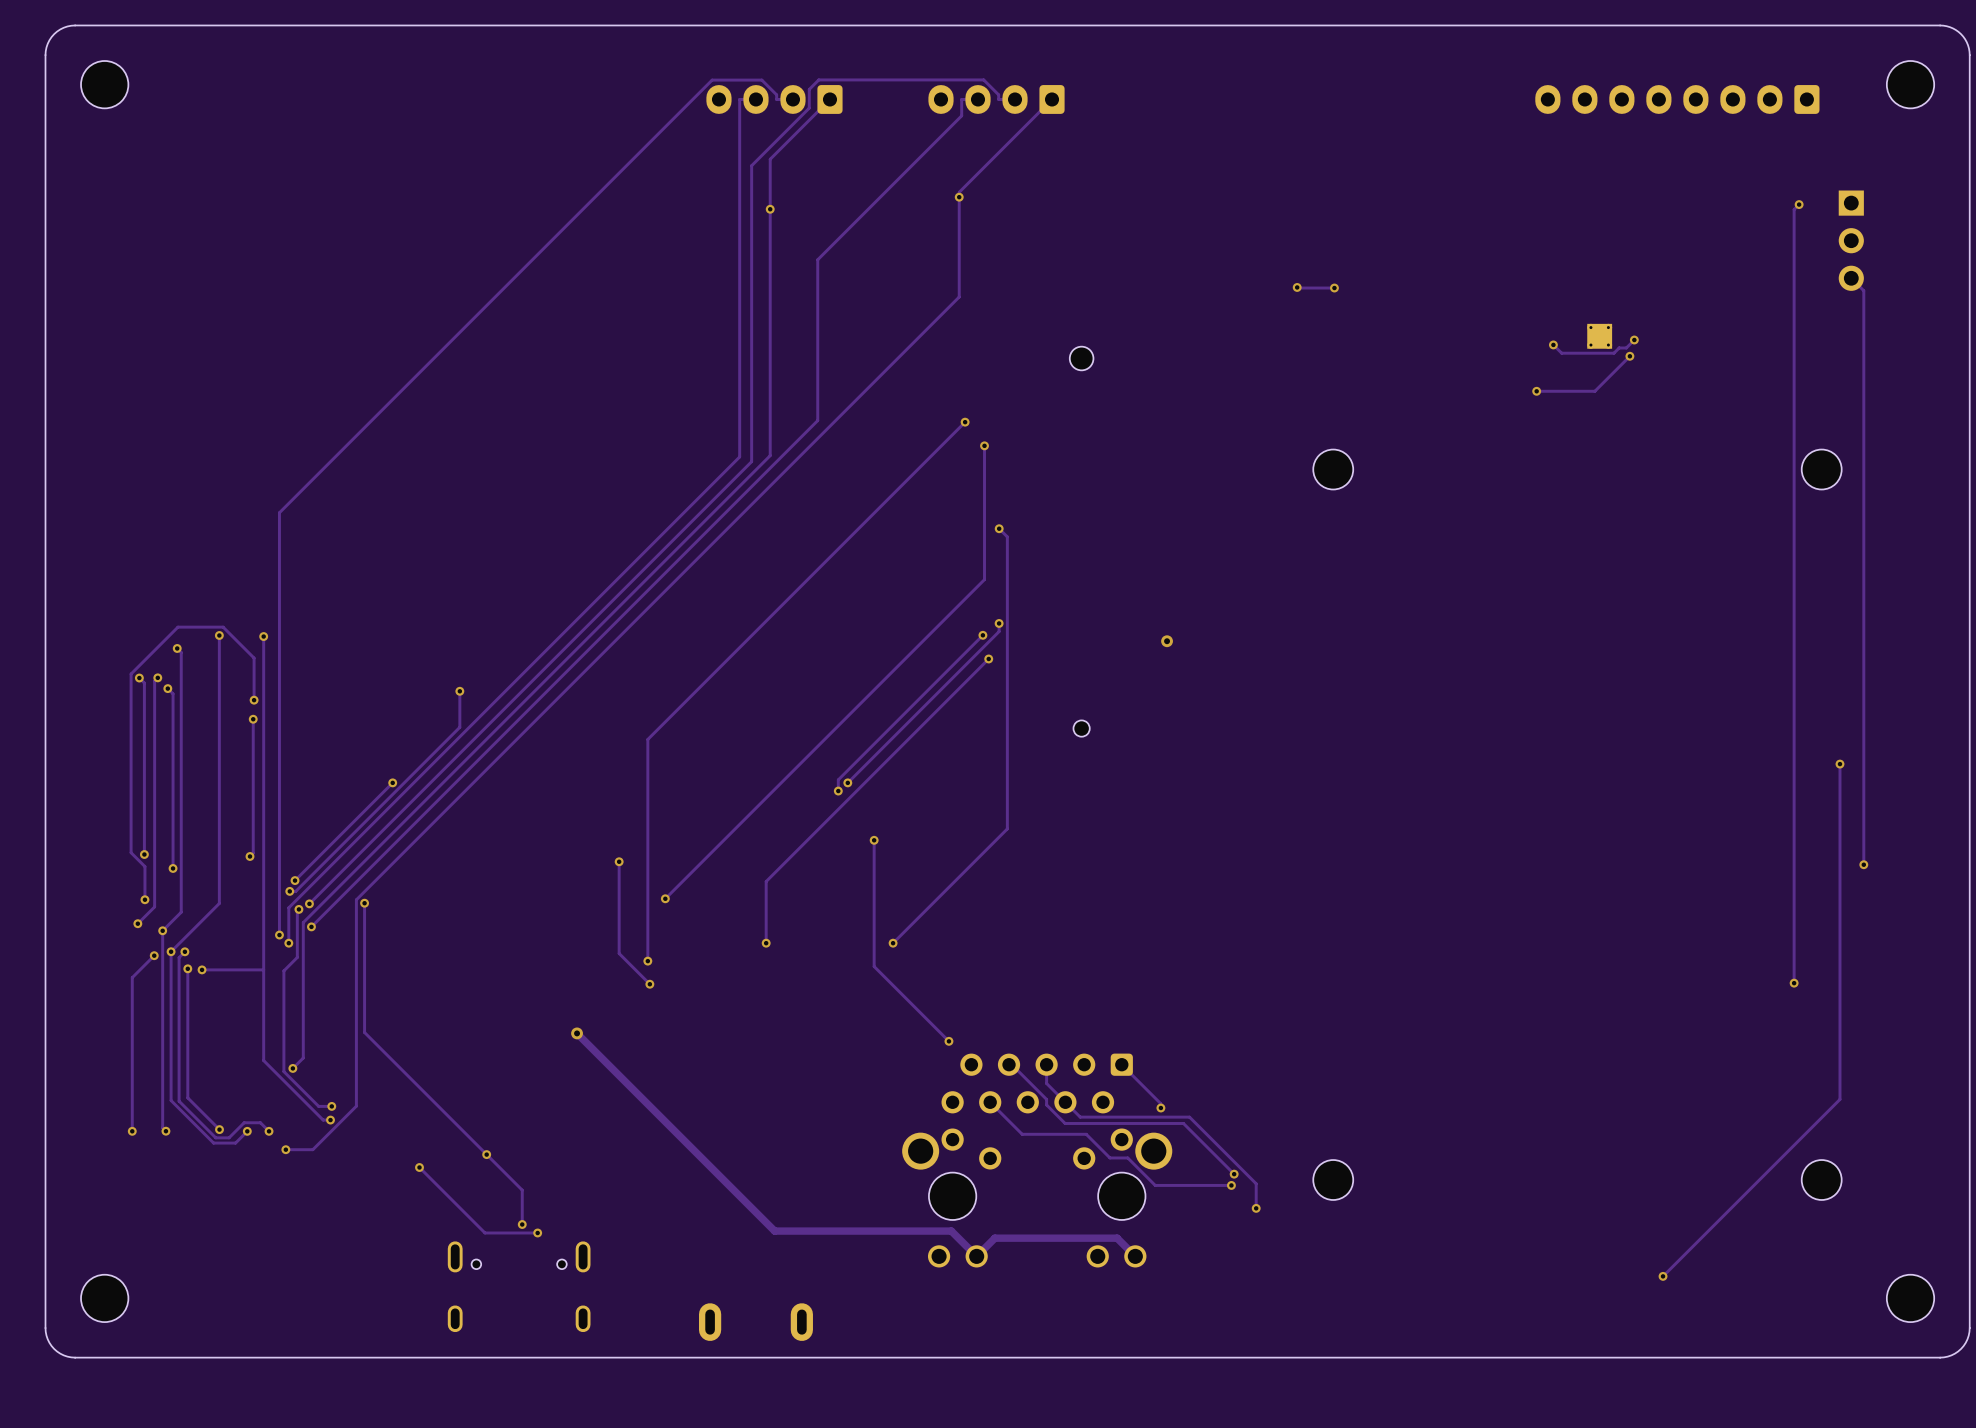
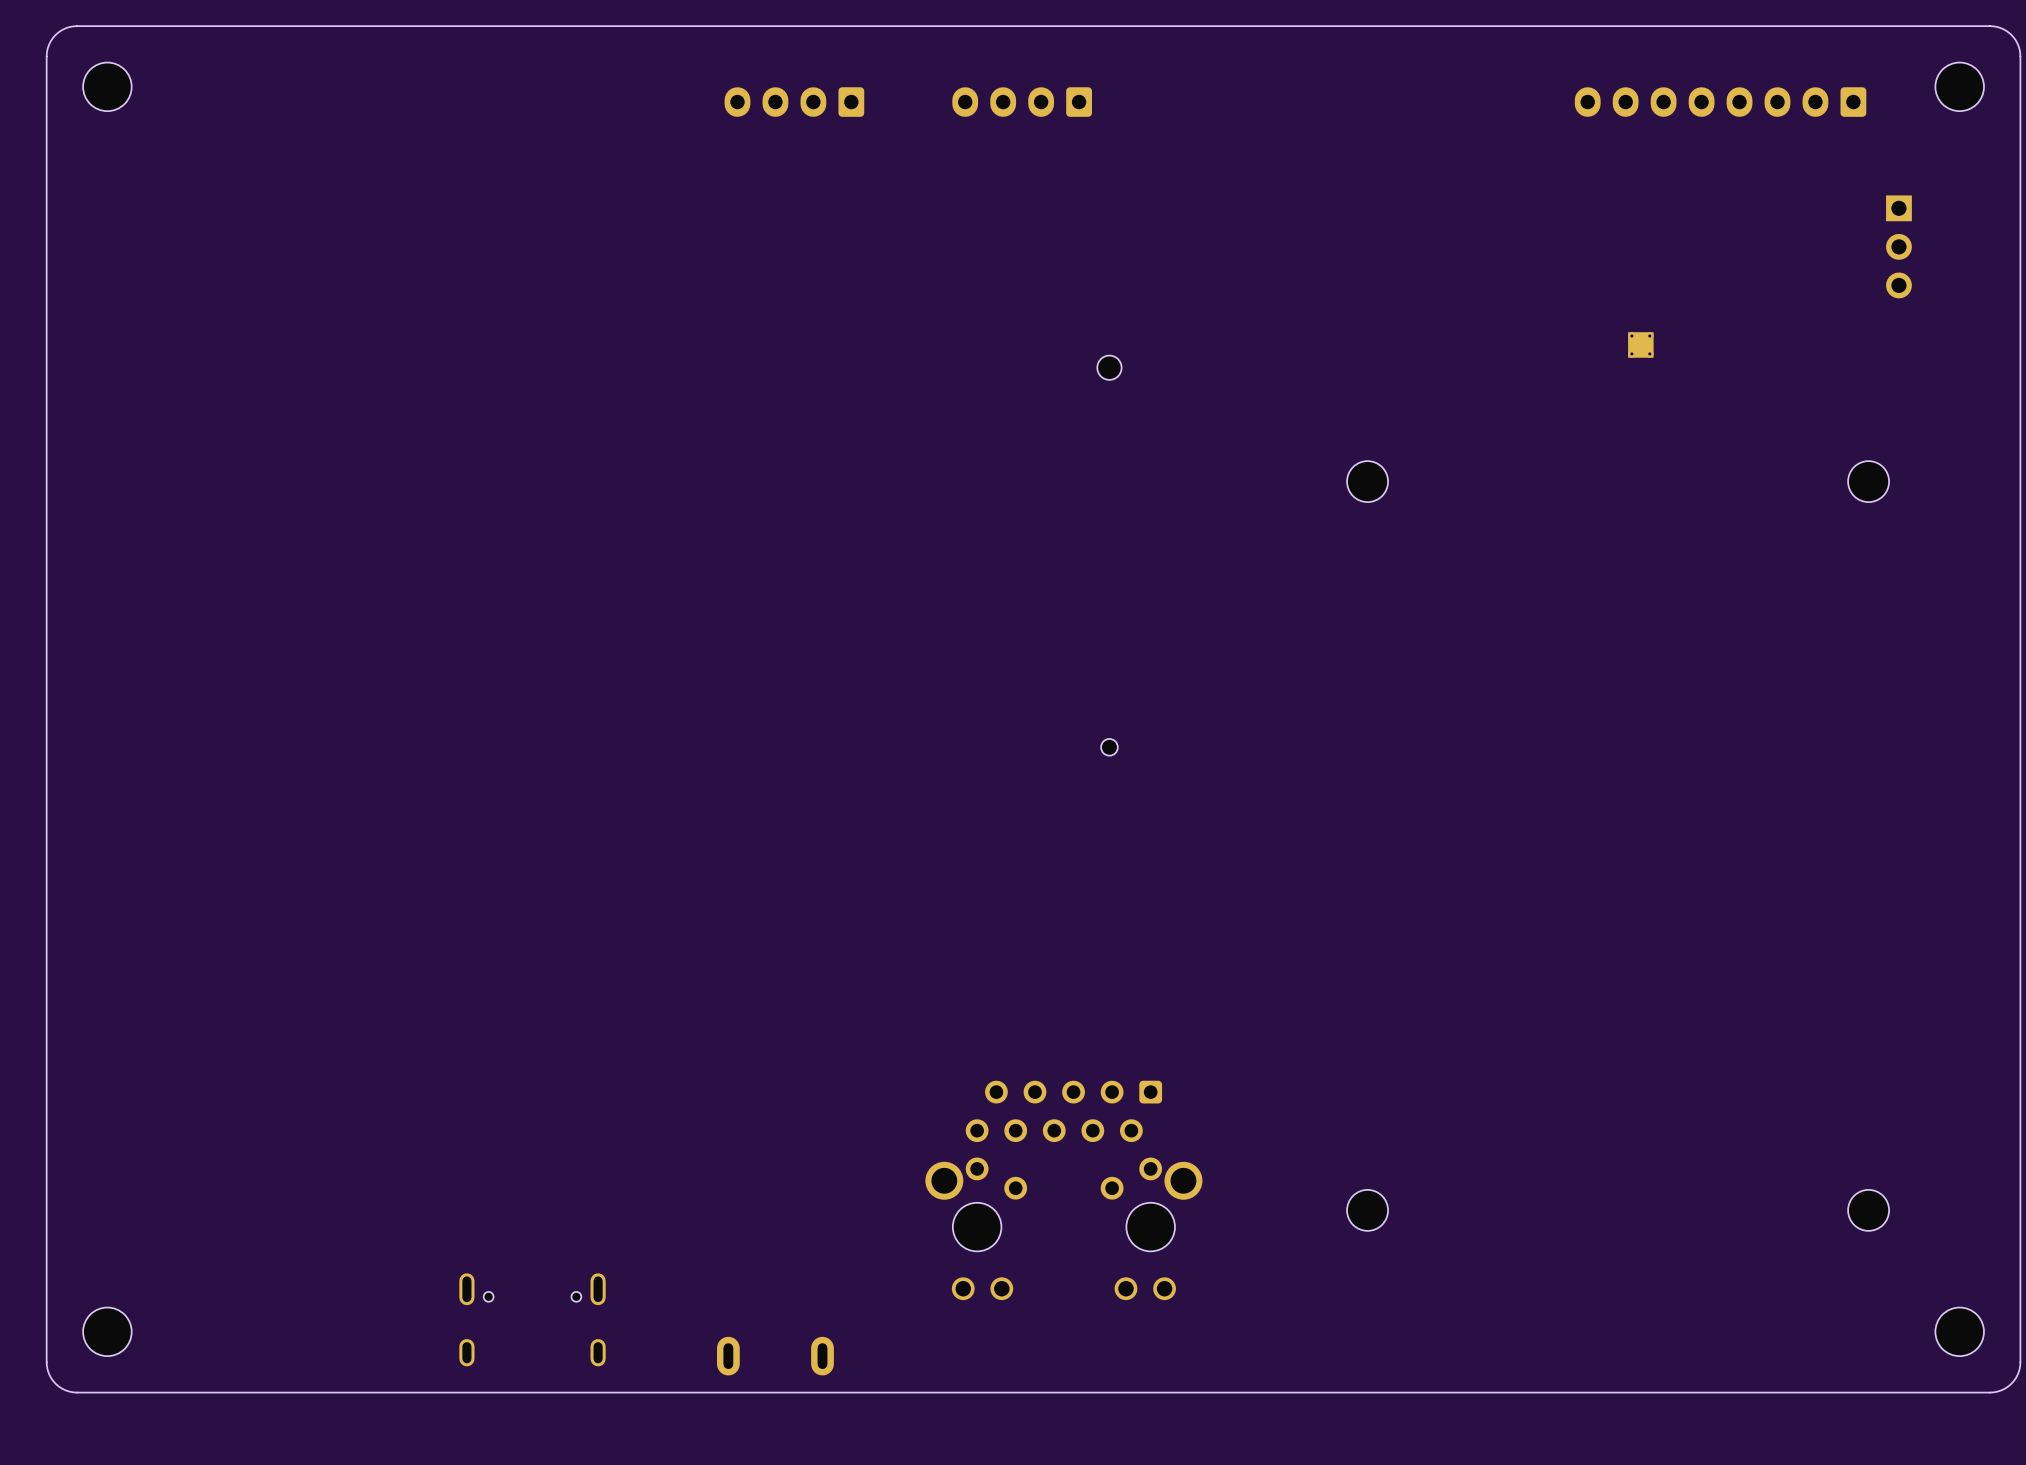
track: (755, 99) (739, 99) (739, 456) (288, 907) (288, 943) -> none
track: (792, 99) (776, 99) (776, 94) (761, 80) (712, 80) (279, 512) (279, 935) -> none
track: (829, 99) (770, 159) (770, 455) (303, 922) (303, 1058) (292, 1068) -> none
track: (978, 99) (961, 99) (961, 115) (817, 259) (817, 420) (311, 926) -> none
track: (1015, 99) (998, 99) (998, 94) (983, 79) (818, 79) (809, 89) (809, 108) (751, 165) (751, 461) (309, 903) -> none
track: (1052, 99) (959, 192) (959, 297) (356, 899) (356, 1106) (312, 1149) (285, 1149) -> none
via: (959, 197) -> none
track: (1799, 204) (1794, 209) (1794, 983) -> none
via: (1799, 204) -> none
via: (770, 209) -> none
track: (1851, 278) (1863, 290) (1863, 864) -> none
track: (1297, 287) (1334, 288) -> none
via: (1297, 287) -> none
via: (1334, 288) -> none
track: (1634, 340) (1626, 348) (1619, 348) (1613, 353) (1561, 353) (1553, 344) -> none
via: (1634, 340) -> none
via: (1553, 344) -> none
track: (1629, 356) (1594, 391) (1536, 391) -> none
via: (1629, 356) -> none
via: (1536, 391) -> none
track: (965, 422) (647, 739) (647, 961) -> none
via: (965, 422) -> none
track: (984, 445) (984, 579) (665, 898) -> none
via: (984, 445) -> none
track: (999, 528) (1007, 536) (1007, 828) (893, 943) -> none
via: (999, 528) -> none
track: (999, 623) (999, 631) (847, 782) -> none
via: (999, 623) -> none
track: (219, 635) (219, 903) (171, 951) (171, 1100) (213, 1143) (235, 1143) (247, 1131) -> none
via: (219, 635) -> none
track: (982, 635) (838, 779) (838, 791) -> none
via: (982, 635) -> none
track: (263, 636) (263, 1060) (323, 1120) (330, 1120) -> none
via: (263, 636) -> none
via: (1167, 641) -> none
track: (177, 648) (181, 652) (181, 912) (162, 930) (162, 1127) (165, 1131) -> none
via: (177, 648) -> none
track: (988, 658) (766, 881) (766, 943) -> none
via: (988, 658) -> none
track: (157, 677) (154, 681) (154, 906) (137, 923) -> none
via: (157, 677) -> none
track: (139, 678) (144, 683) (144, 854) -> none
via: (139, 678) -> none
track: (167, 688) (173, 693) (173, 868) -> none
via: (167, 688) -> none
track: (459, 691) (459, 727) (295, 891) (289, 891) -> none
via: (459, 691) -> none
track: (254, 700) (254, 658) (223, 627) (177, 627) (131, 674) (131, 852) (144, 866) (144, 899) -> none
via: (254, 700) -> none
track: (253, 719) (253, 853) (250, 856) -> none
via: (253, 719) -> none
track: (1839, 764) (1839, 1099) (1663, 1276) -> none
via: (1839, 764) -> none
track: (392, 782) (295, 880) -> none
via: (392, 782) -> none
via: (847, 782) -> none
via: (838, 791) -> none
track: (874, 840) (874, 966) (948, 1041) -> none
via: (874, 840) -> none
via: (144, 854) -> none
via: (250, 856) -> none
track: (619, 861) (619, 953) (649, 984) -> none
via: (619, 861) -> none
via: (1863, 864) -> none
via: (173, 868) -> none
via: (295, 880) -> none
via: (289, 891) -> none
via: (665, 898) -> none
via: (144, 899) -> none
via: (309, 903) -> none
track: (364, 903) (364, 1032) (522, 1190) (522, 1224) -> none
via: (364, 903) -> none
track: (298, 909) (297, 911) (297, 957) (283, 970) (283, 1071) (318, 1106) (331, 1106) -> none
via: (298, 909) -> none
via: (137, 923) -> none
via: (311, 926) -> none
via: (162, 930) -> none
via: (279, 935) -> none
via: (288, 943) -> none
via: (766, 943) -> none
via: (893, 943) -> none
via: (171, 951) -> none
track: (184, 951) (179, 957) (179, 1101) (215, 1137) (229, 1137) (244, 1122) (260, 1122) (269, 1131) -> none
via: (184, 951) -> none
track: (154, 955) (132, 977) (132, 1131) -> none
via: (154, 955) -> none
via: (647, 961) -> none
track: (187, 968) (187, 1097) (219, 1129) -> none
via: (187, 968) -> none
via: (202, 969) -> none
track: (263, 969) (202, 969) -> none
via: (1794, 983) -> none
via: (649, 984) -> none
track: (577, 1033) (774, 1231) (951, 1231) (976, 1256) (994, 1238) (1117, 1238) (1135, 1256) -> none
via: (577, 1033) -> none
via: (948, 1041) -> none
track: (1009, 1064) (1011, 1064) (1046, 1099) (1046, 1104) (1065, 1123) (1183, 1123) (1234, 1174) -> none
track: (1046, 1064) (1046, 1083) (1080, 1117) (1189, 1117) (1256, 1183) (1256, 1208) -> none
track: (1121, 1064) (1160, 1103) (1160, 1108) -> none
via: (292, 1068) -> none
track: (990, 1102) (1022, 1134) (1086, 1134) (1109, 1157) (1127, 1157) (1155, 1185) (1231, 1185) -> none
via: (331, 1106) -> none
via: (1160, 1108) -> none
via: (330, 1120) -> none
via: (219, 1129) -> none
via: (132, 1131) -> none
via: (165, 1131) -> none
via: (247, 1131) -> none
via: (269, 1131) -> none
via: (285, 1149) -> none
via: (486, 1154) -> none
track: (419, 1167) (484, 1232) (537, 1232) -> none
via: (419, 1167) -> none
via: (1234, 1174) -> none
via: (1231, 1185) -> none
via: (1256, 1208) -> none
via: (522, 1224) -> none
via: (537, 1232) -> none
via: (1663, 1276) -> none

